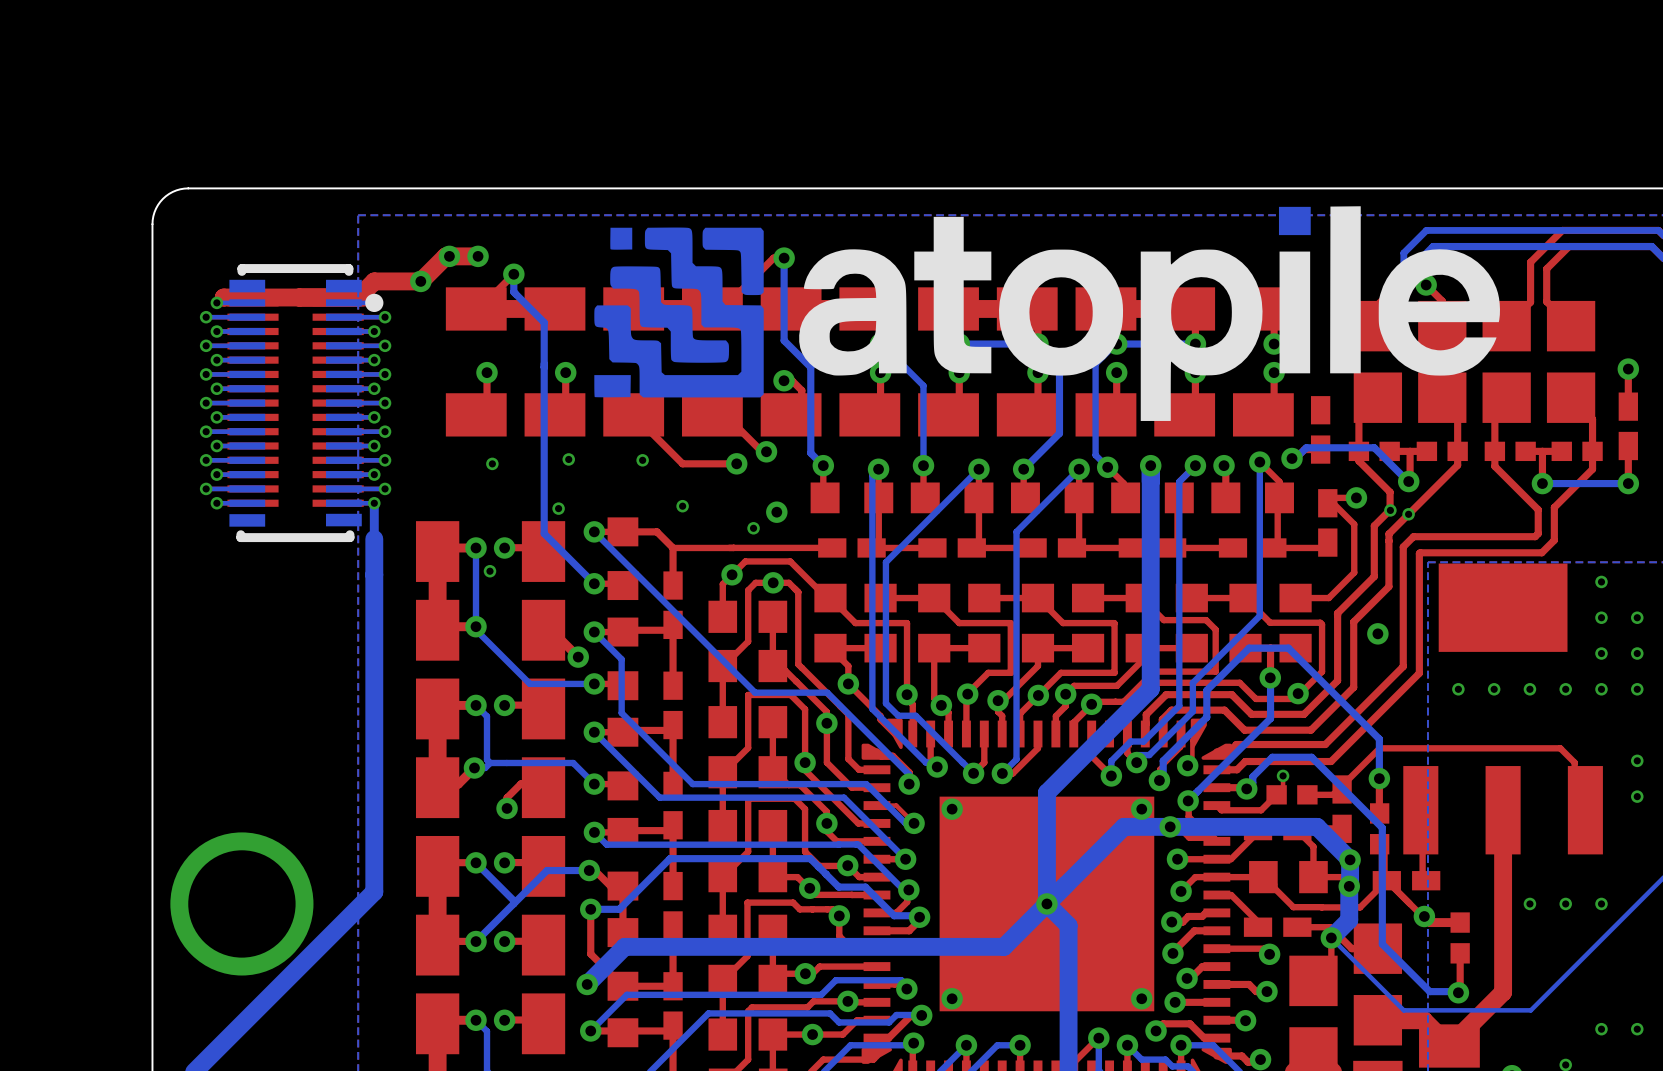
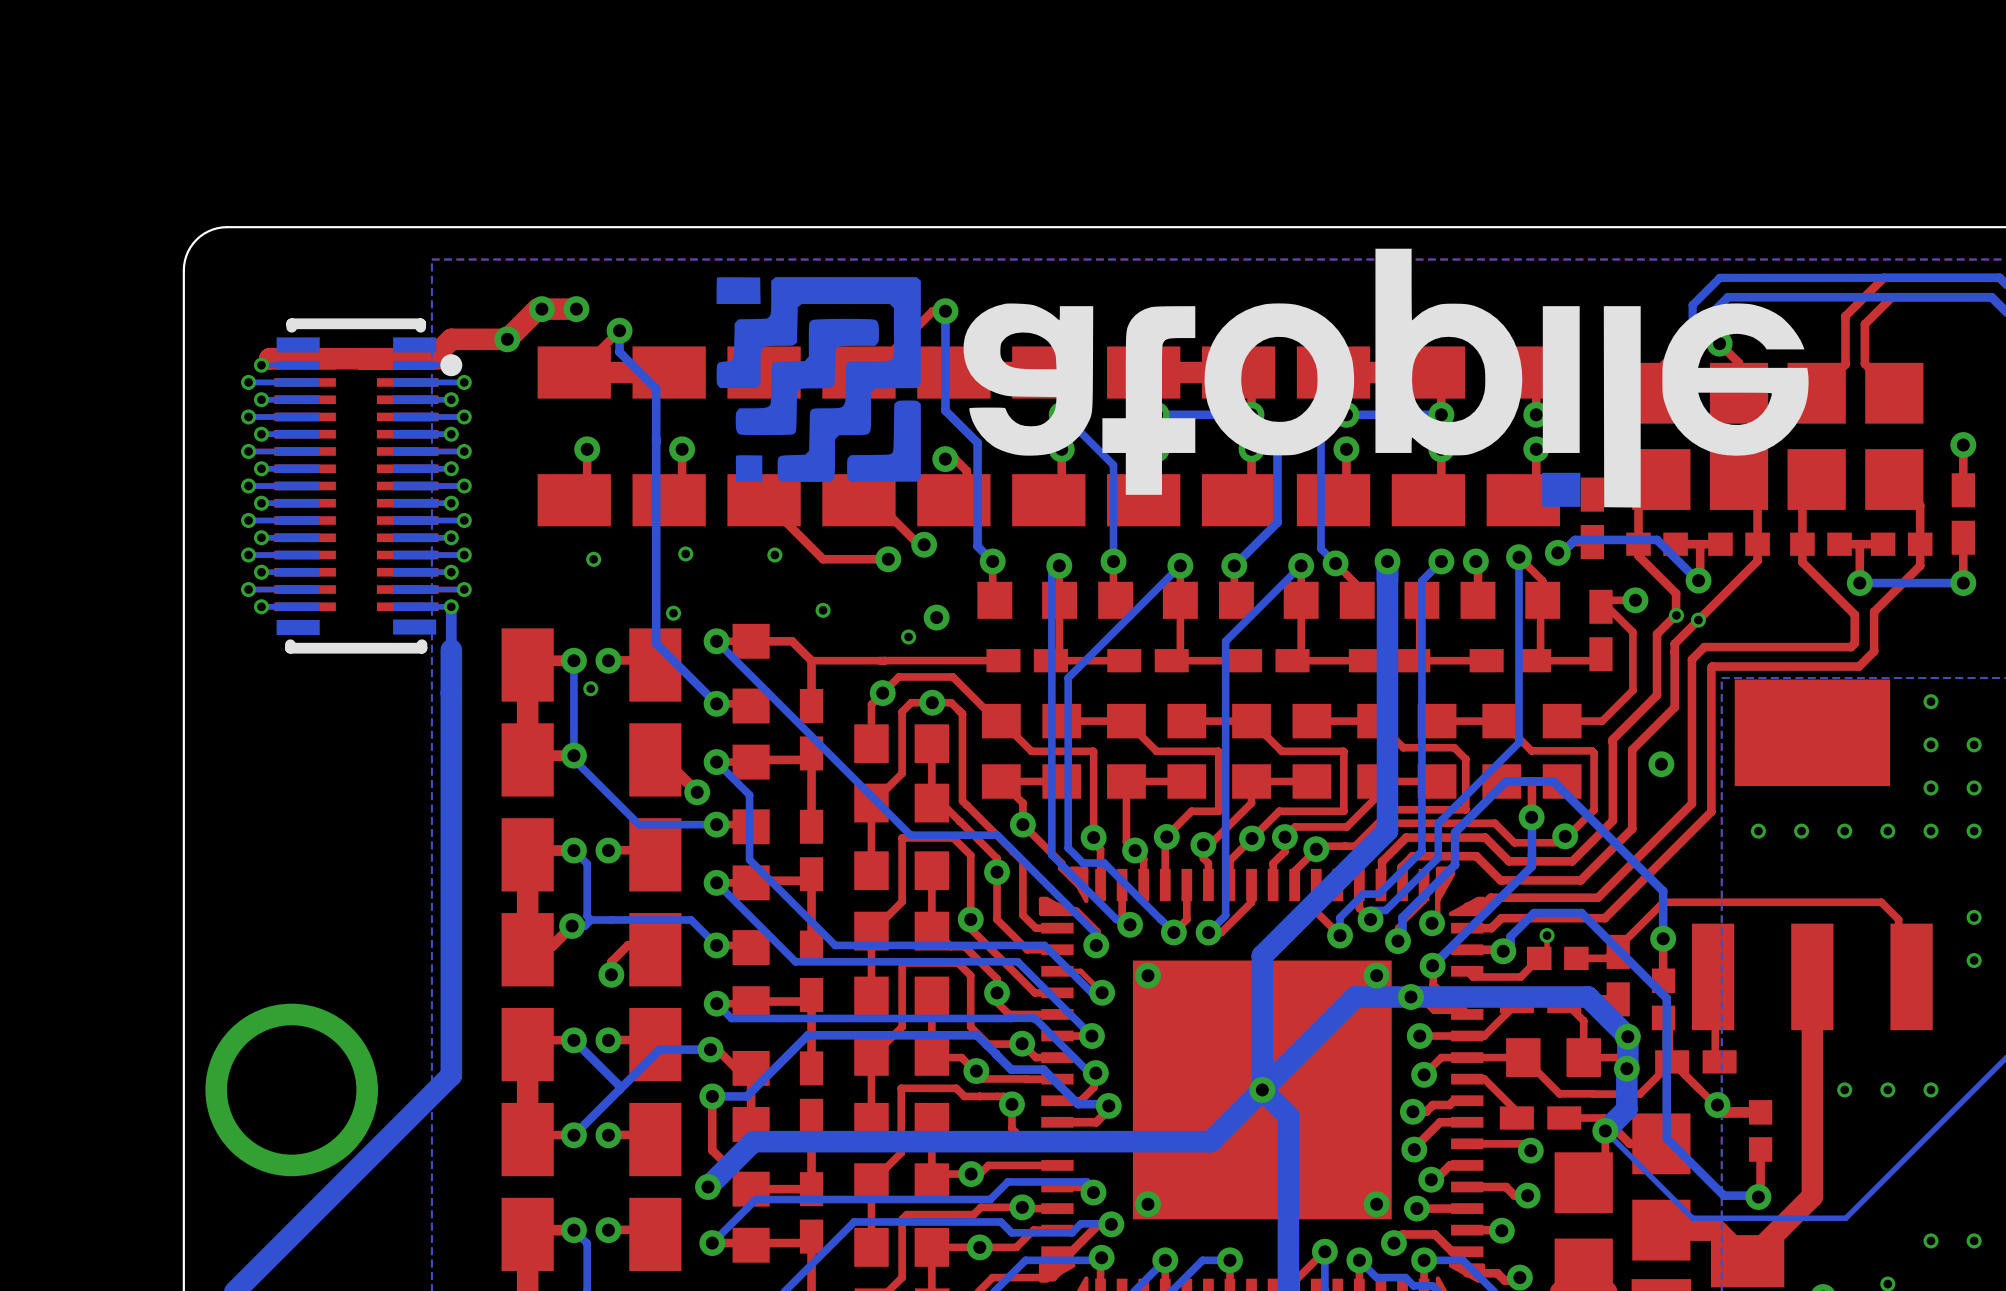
drawing shape: [594, 206, 1500, 421] -> [716, 248, 1809, 508]

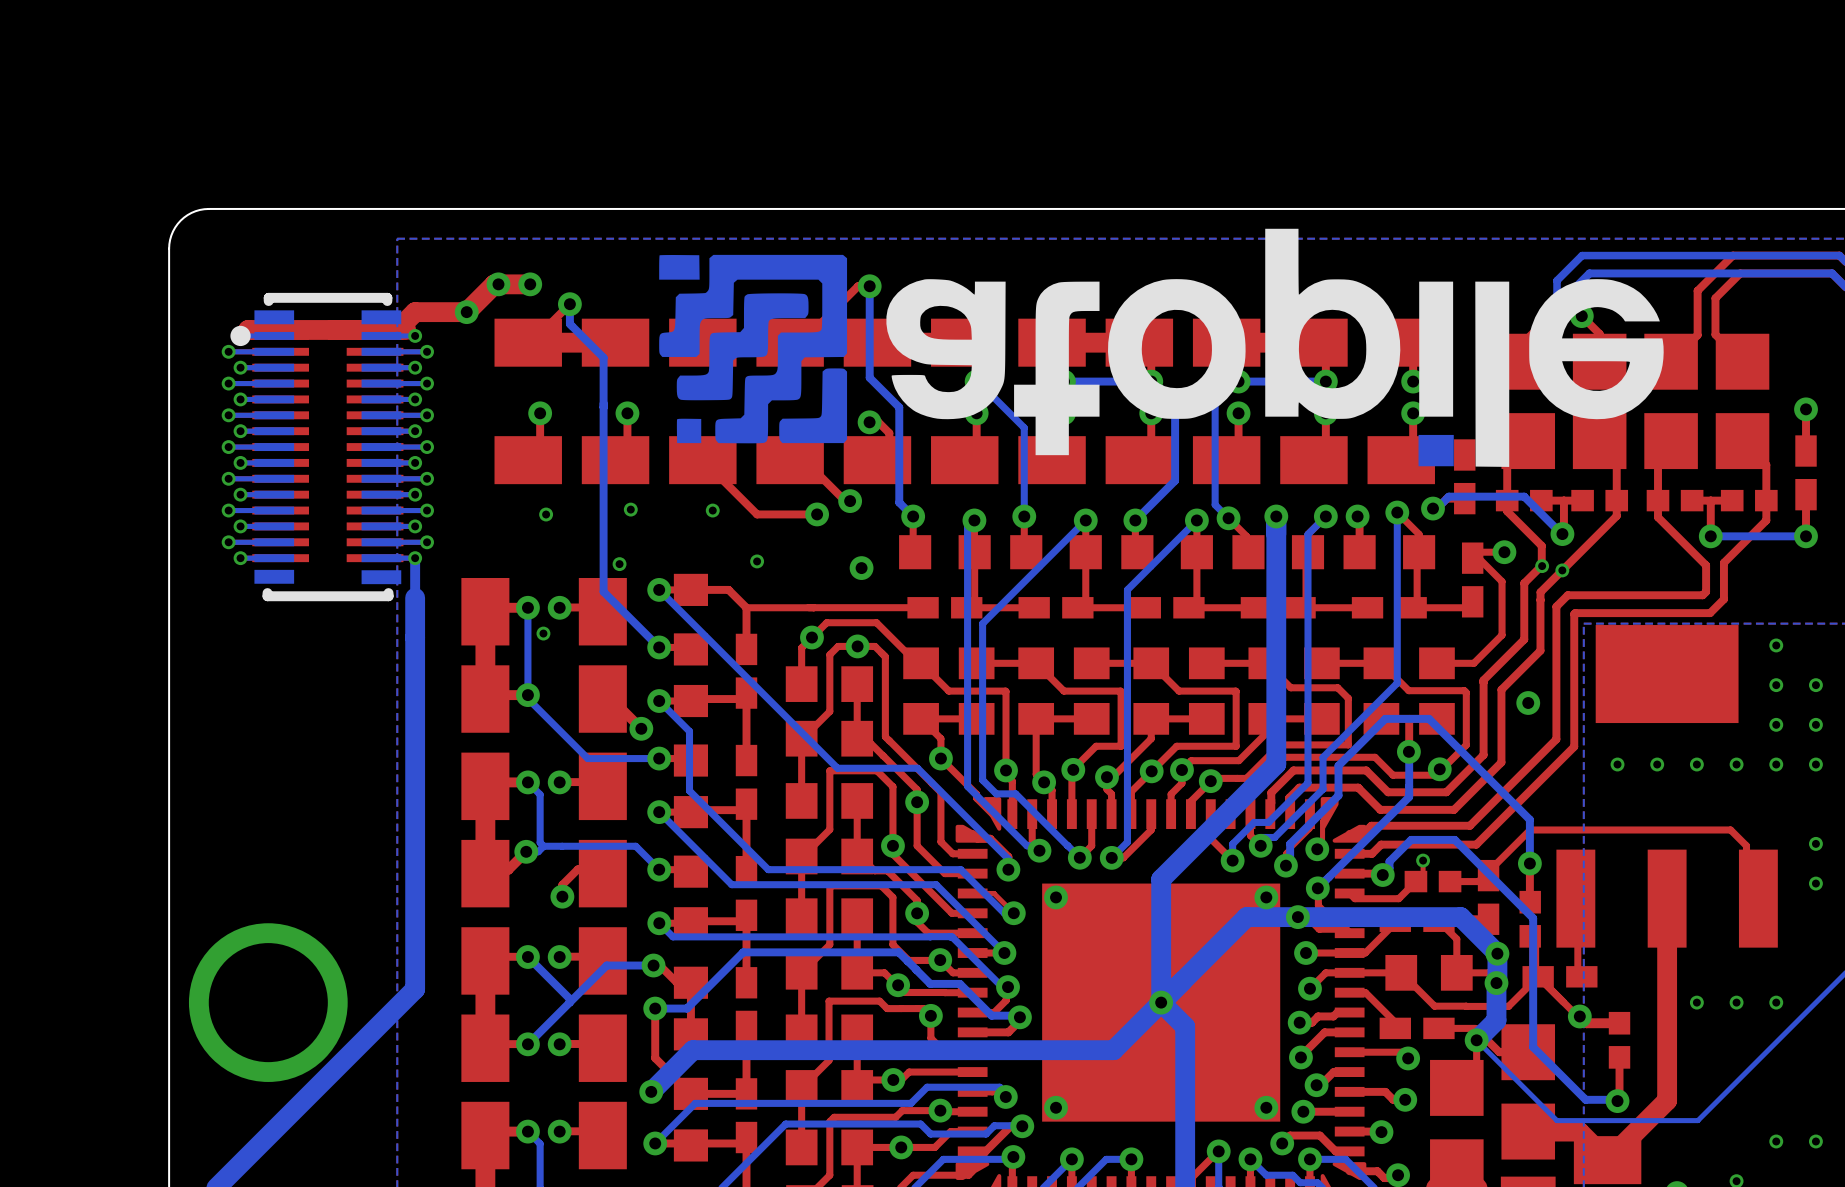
part footprint: [276, 318, 463, 654] -> [230, 292, 402, 602]
via: (908, 636) -> none

